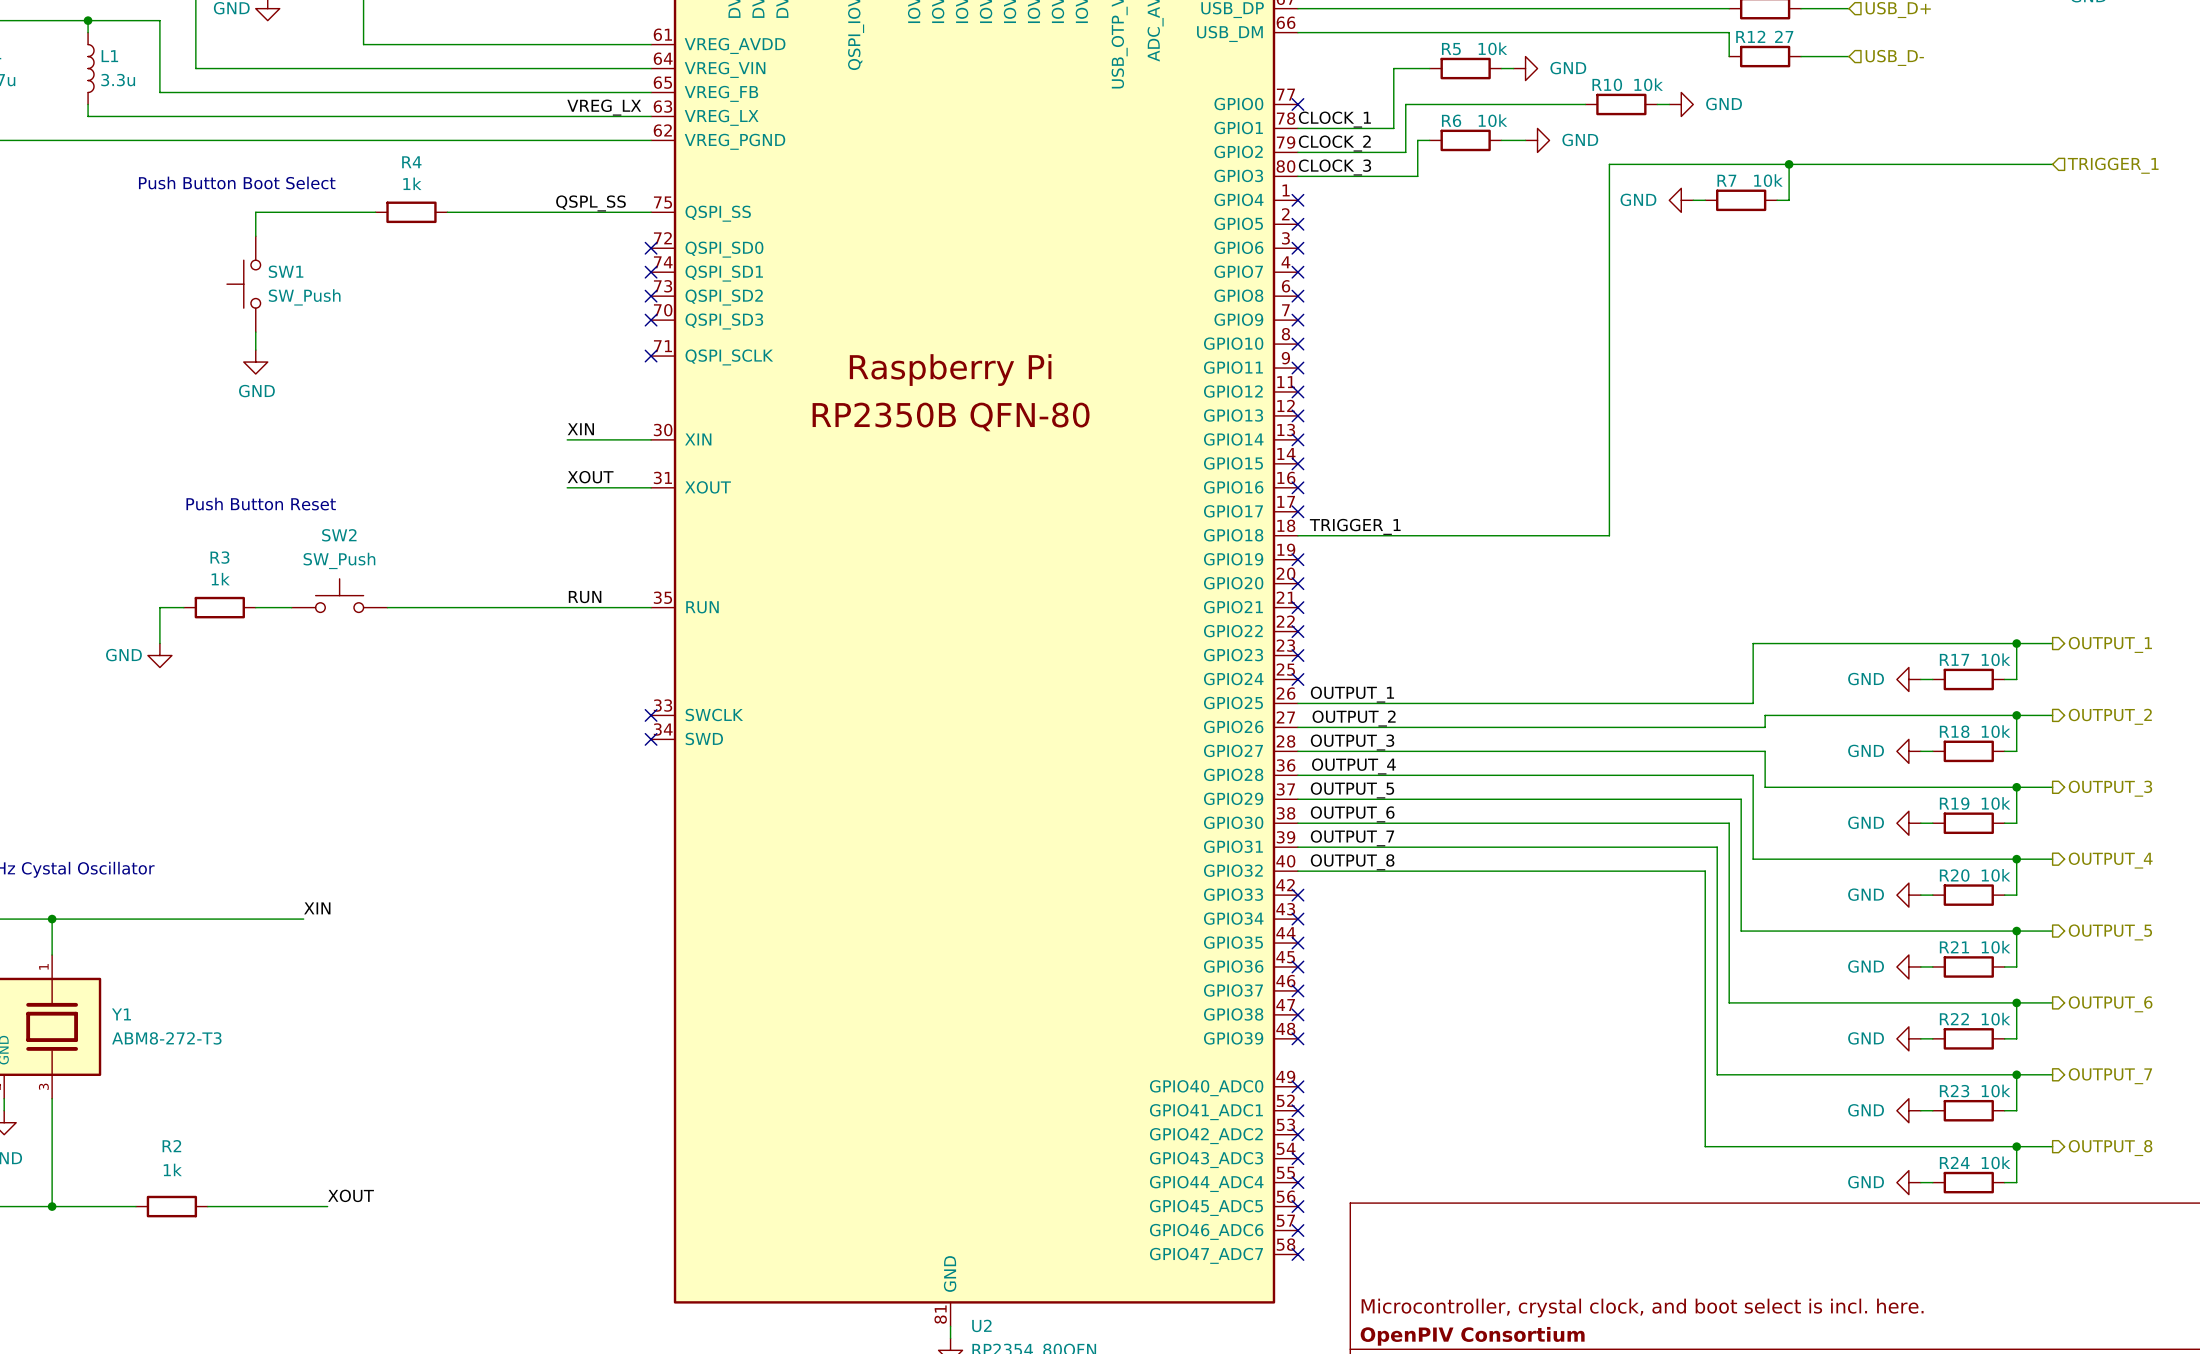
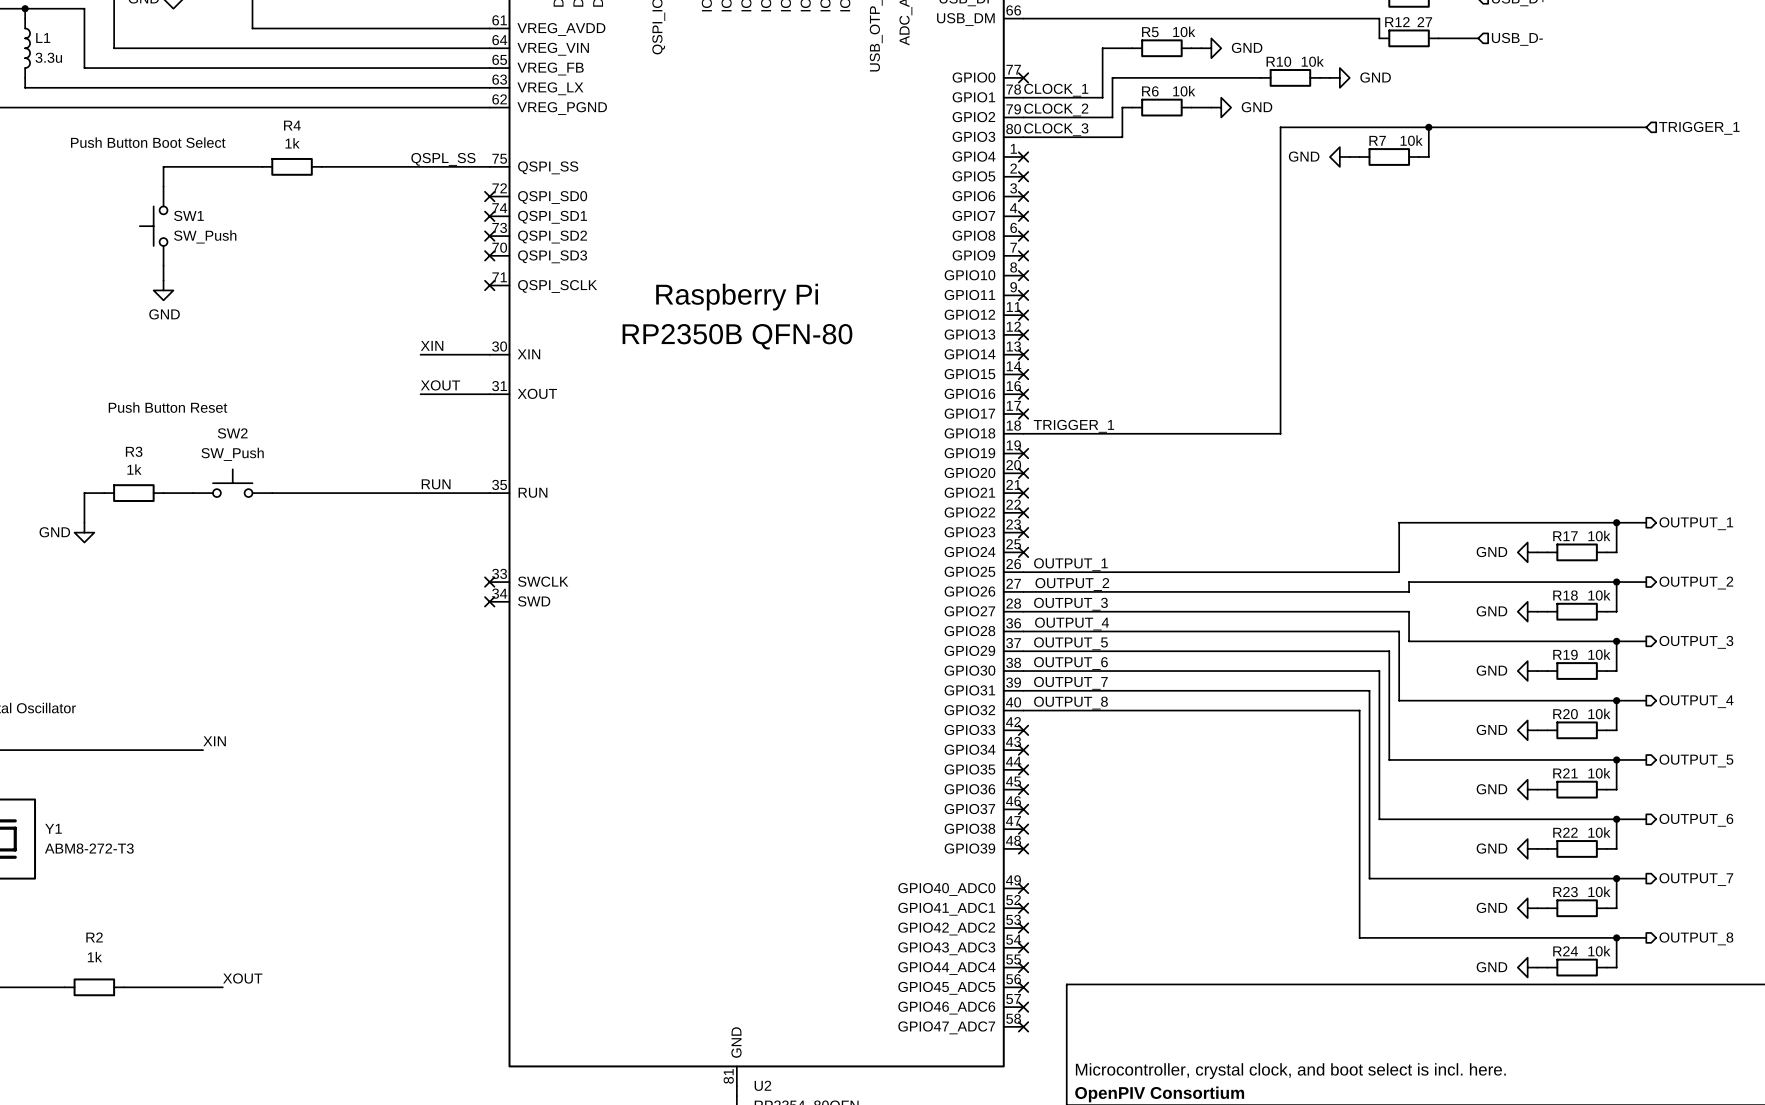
label: VREG_LX (604, 107) -> none

